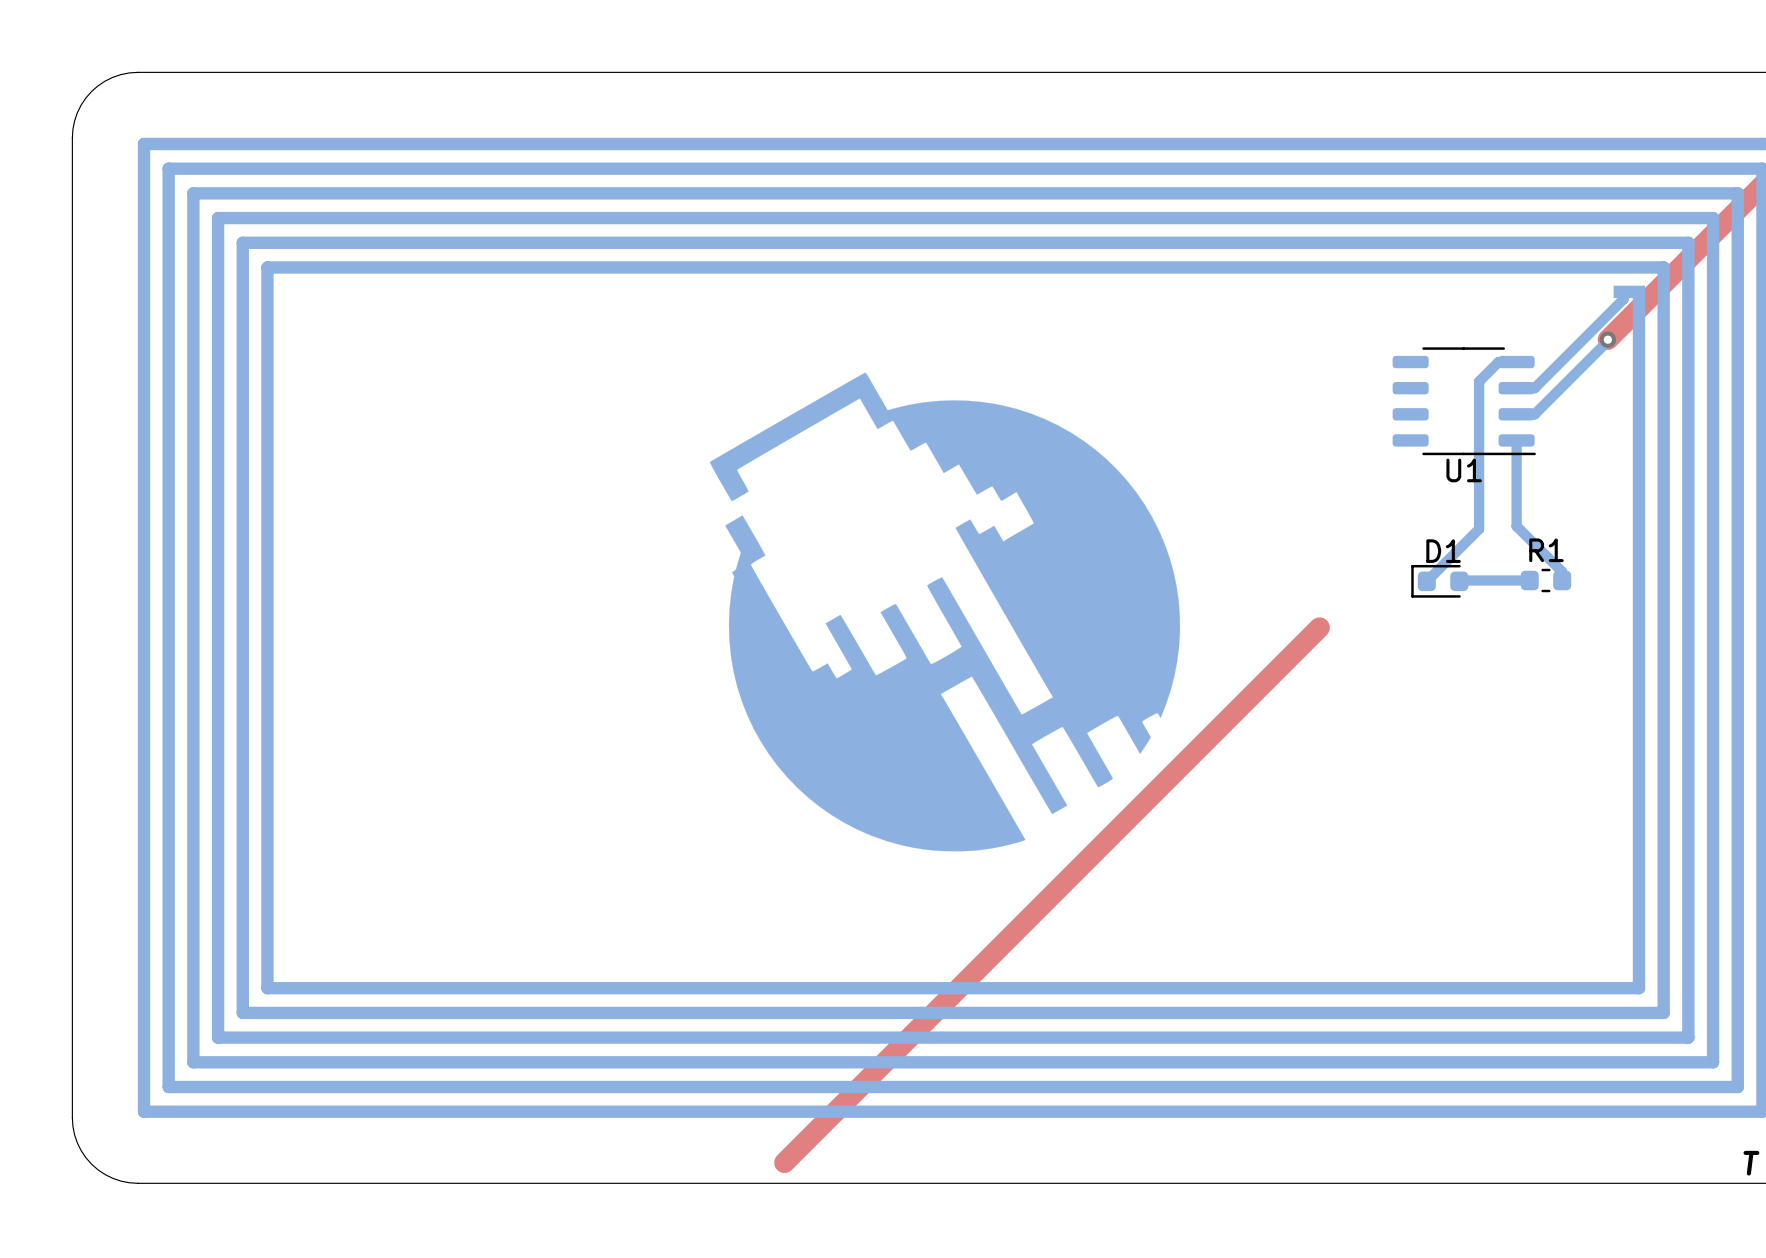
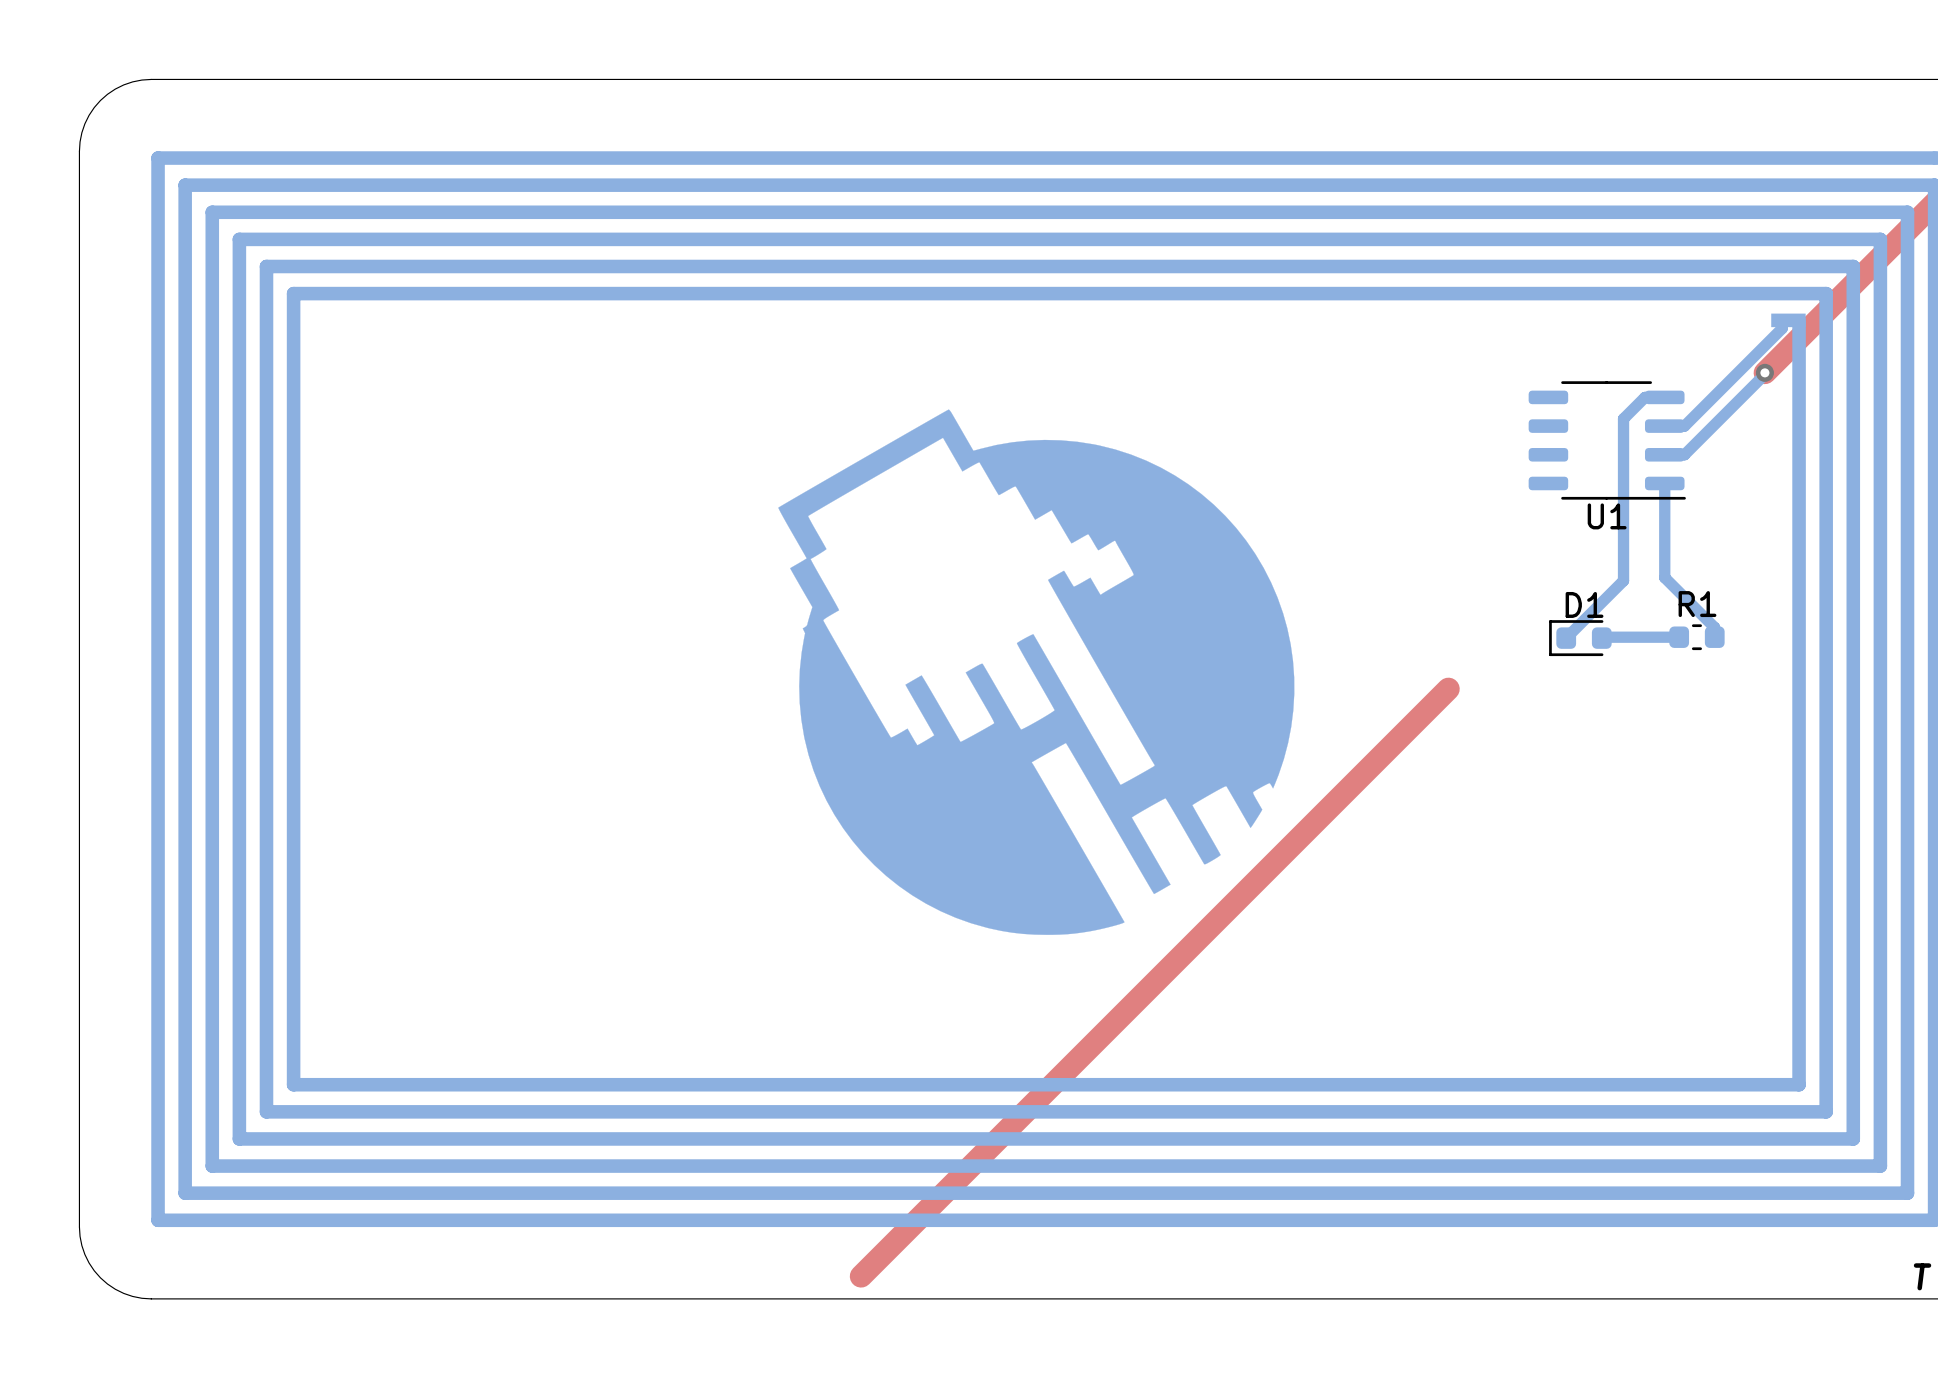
drawing shape: [709, 372, 1180, 852] -> [778, 409, 1295, 935]

